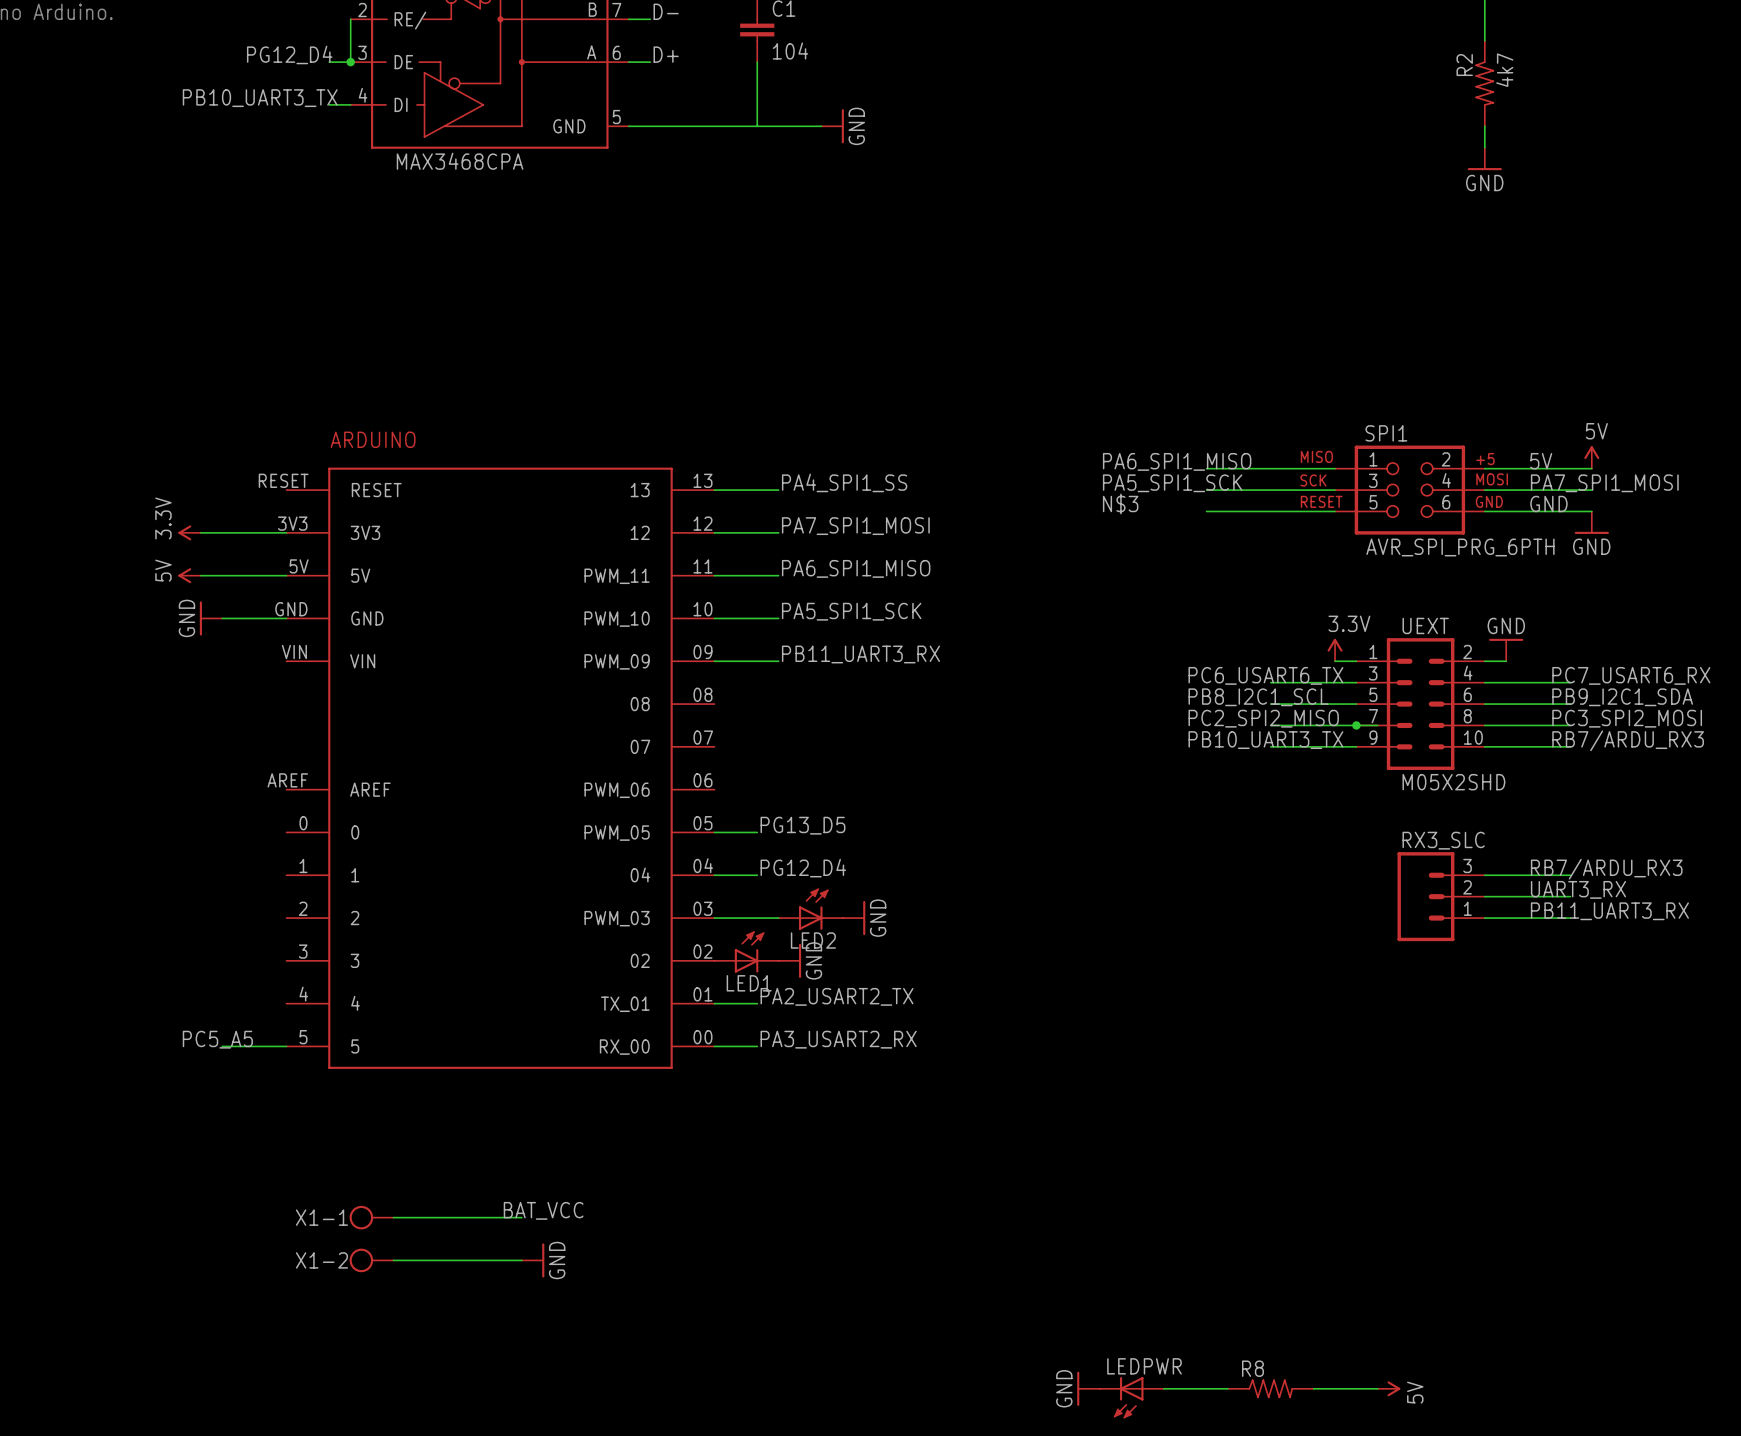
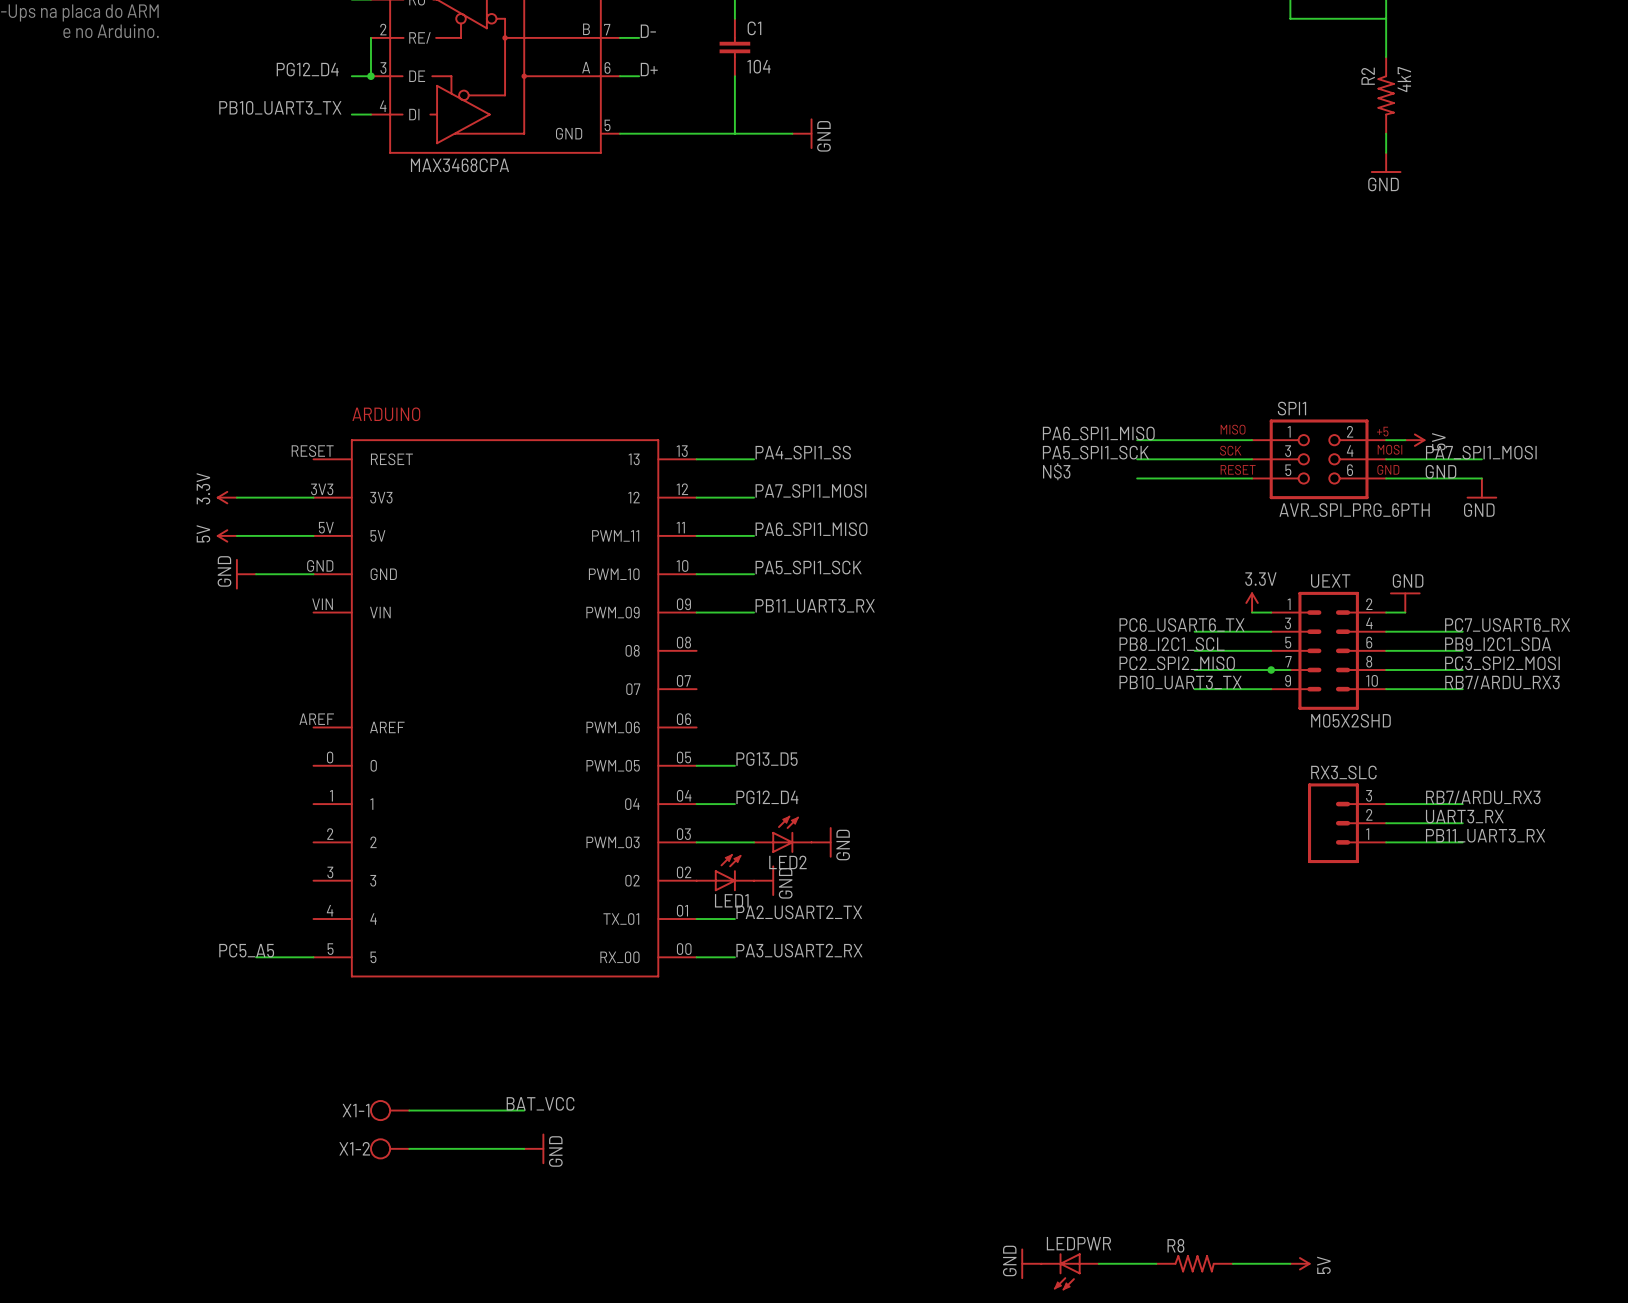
power symbol rotation: 0° (1591, 452) -> 90° clockwise (1419, 440)
power symbol position: 5V (1591, 457) -> 5V (1415, 440)
label: 5V (1541, 461) -> none
wire: (1506, 468) (1591, 468) -> none

